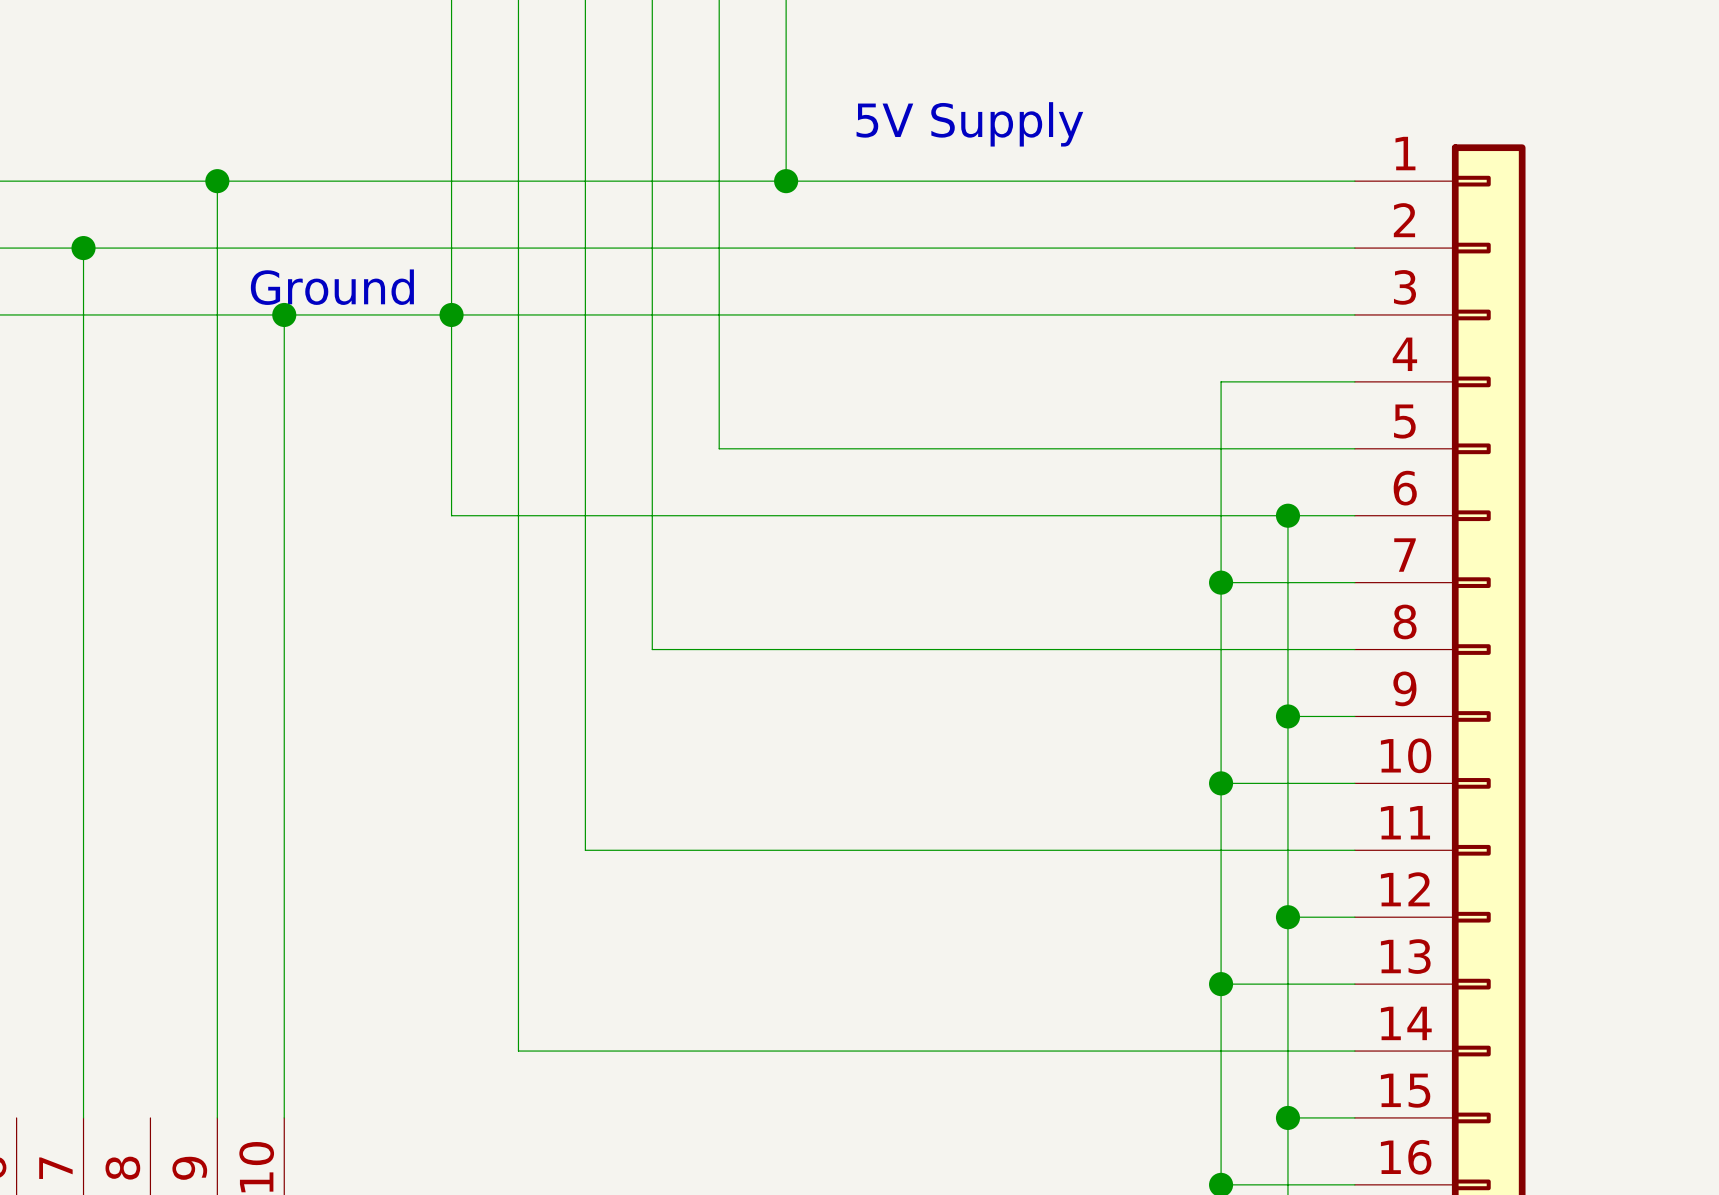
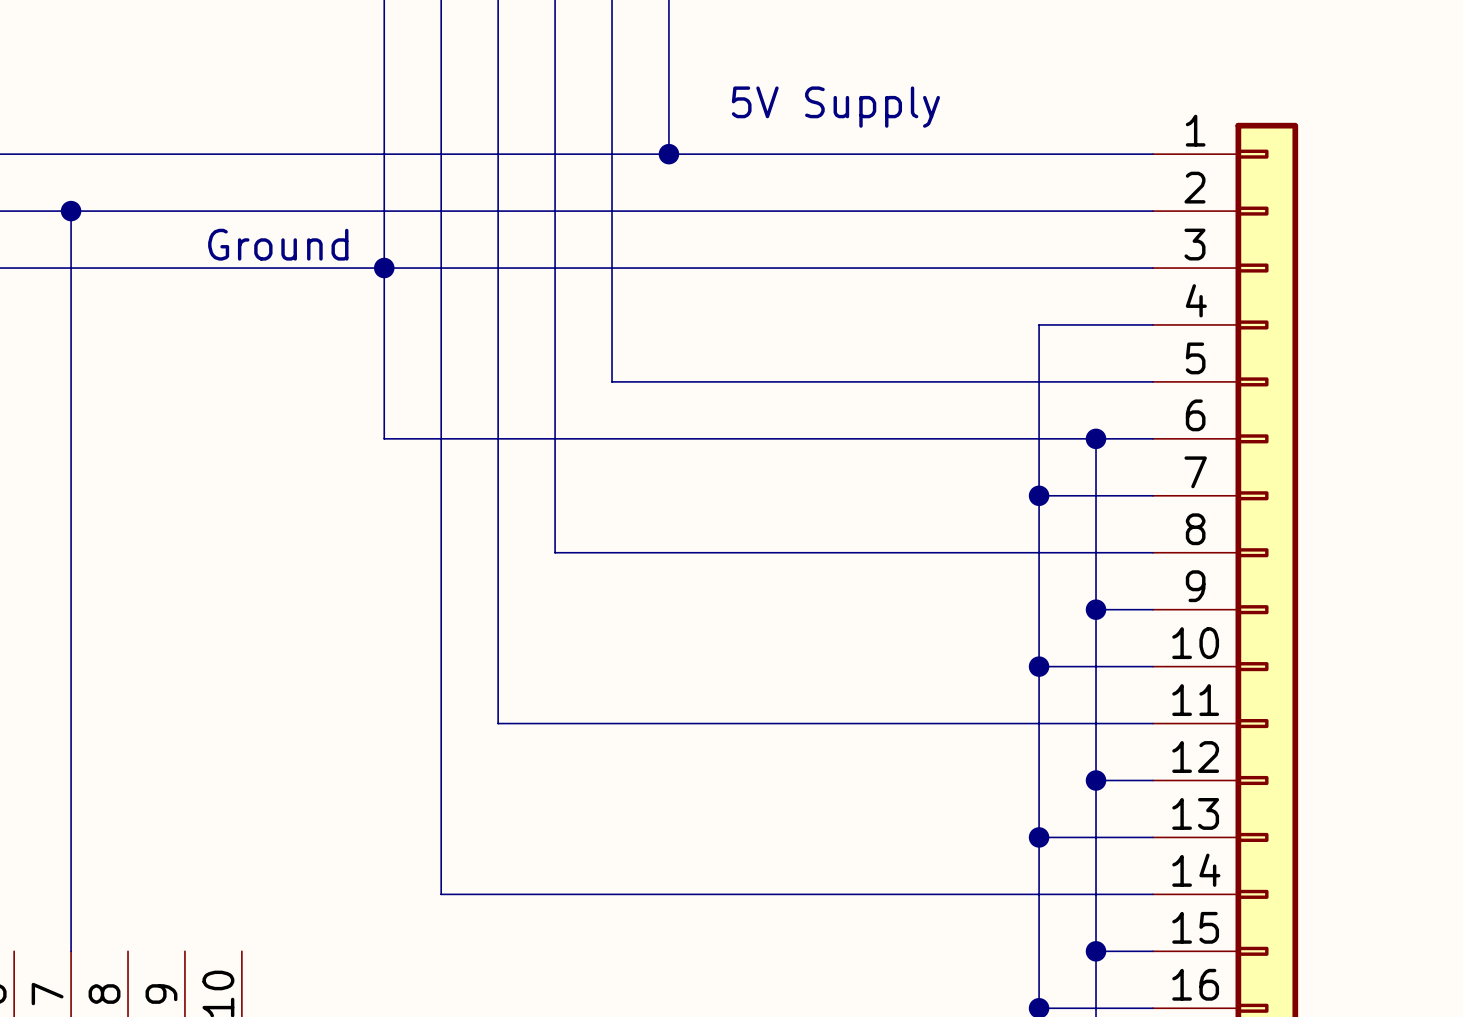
wire: (217, 181) (217, 1117) -> none
junction: (217, 181) -> none
wire: (284, 314) (284, 1117) -> none
junction: (284, 314) -> none

